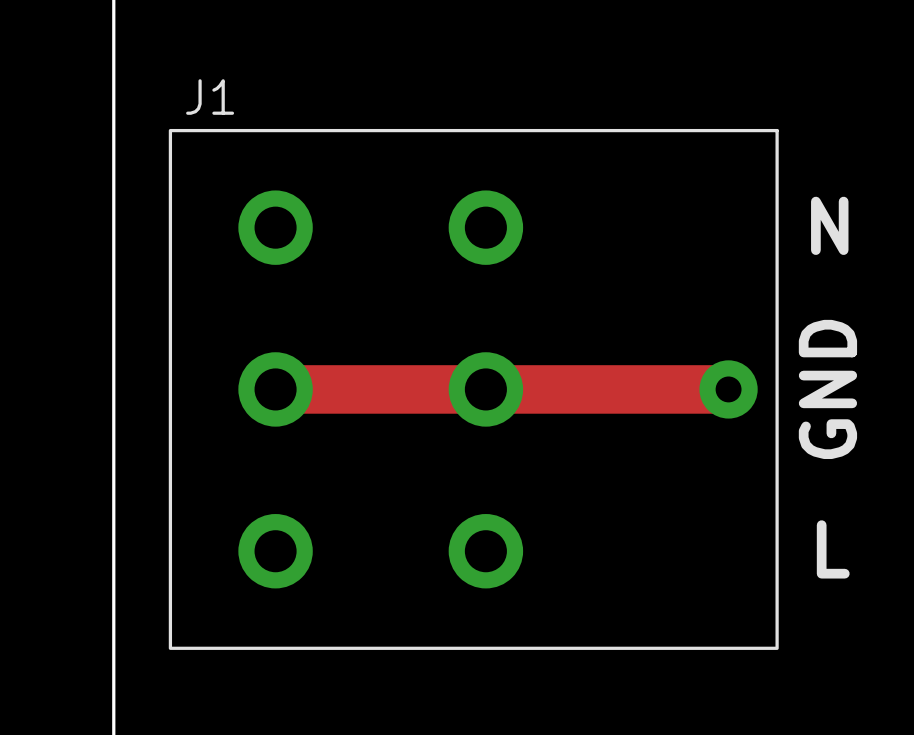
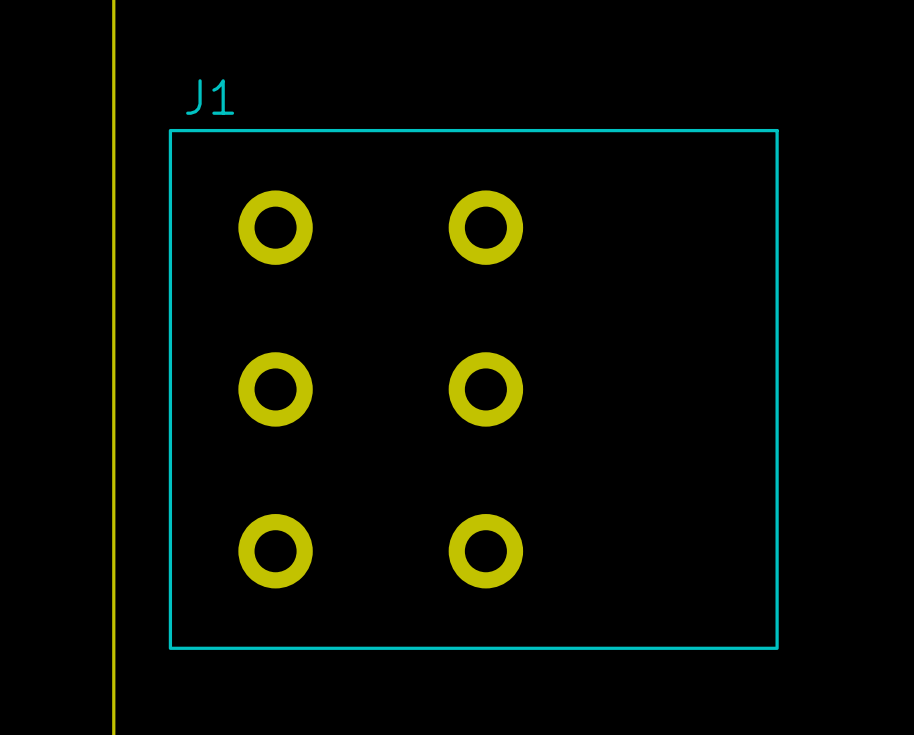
text: N (829, 225) -> none
track: (275, 389) (728, 389) -> none
via: (728, 389) -> none
text: GND (827, 389) -> none
text: L (833, 549) -> none

